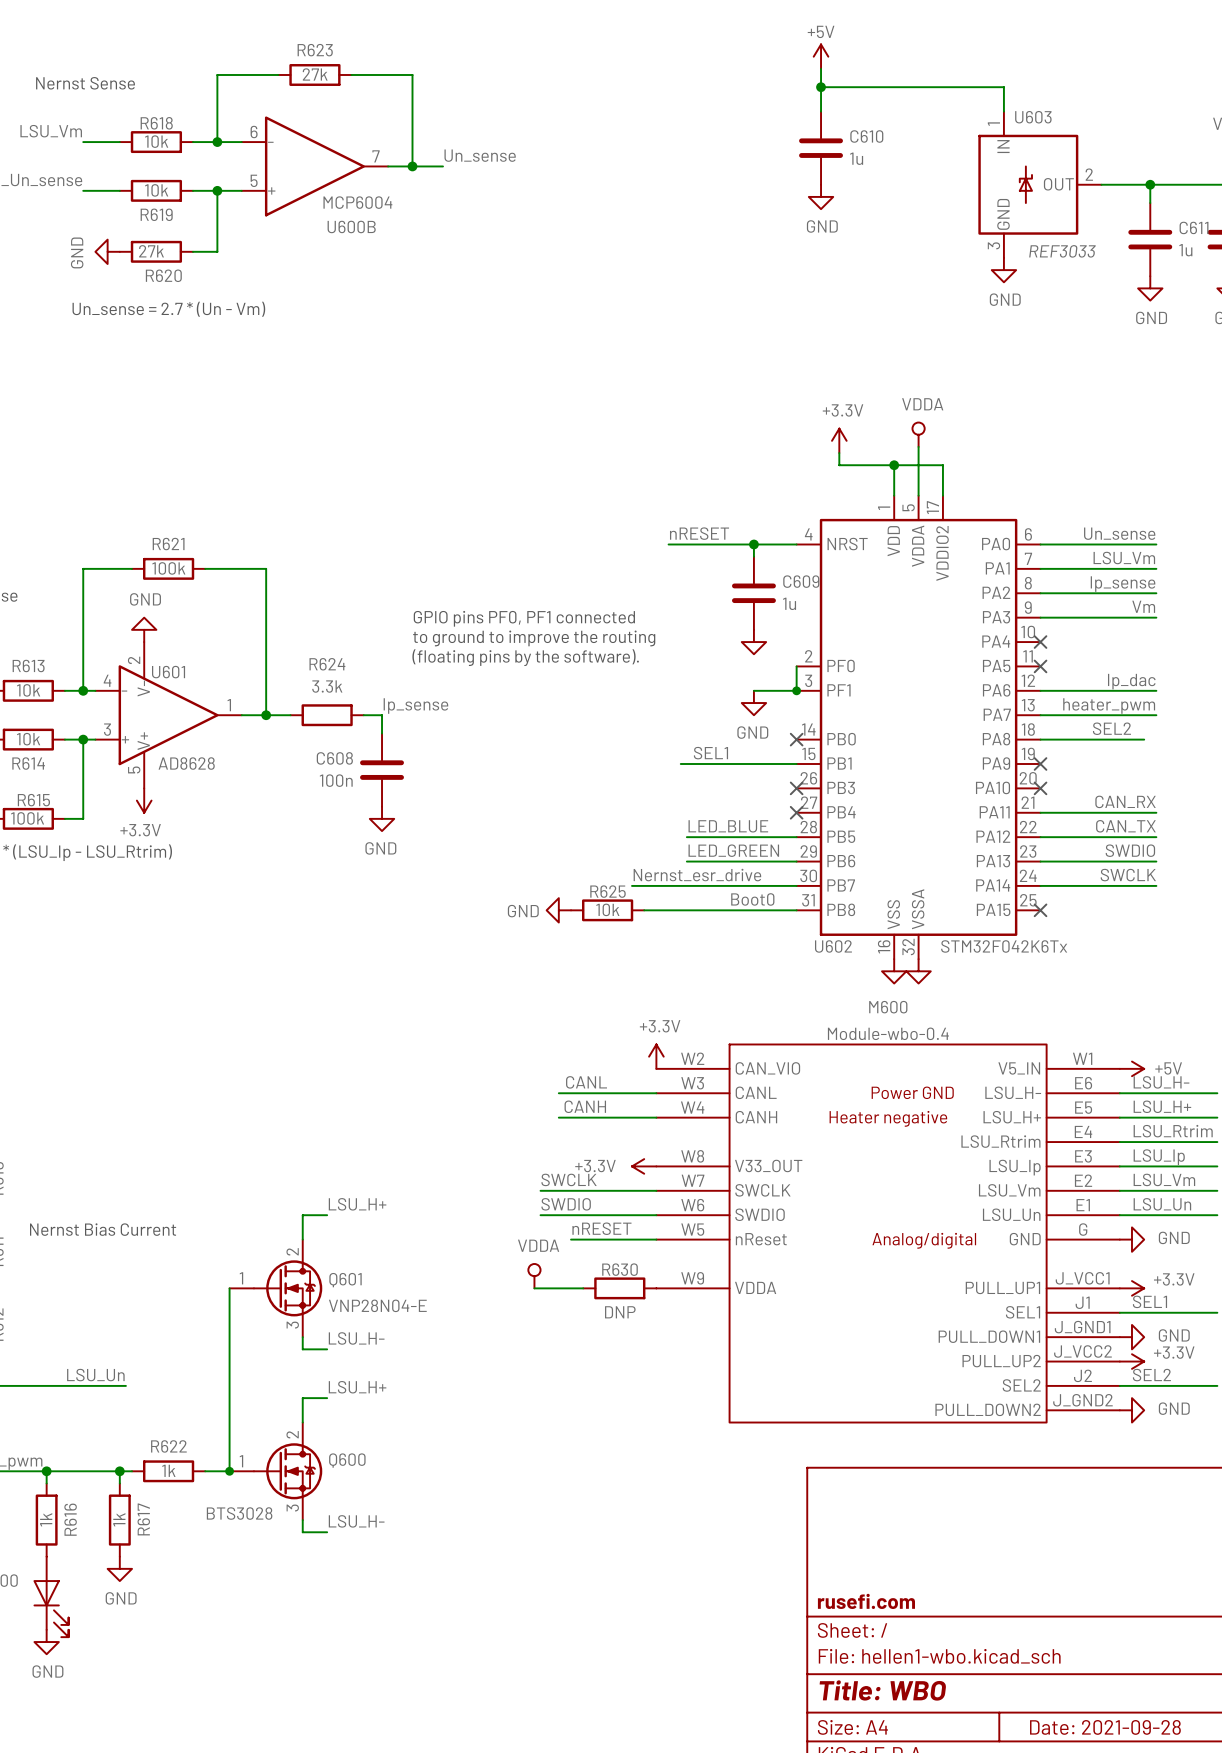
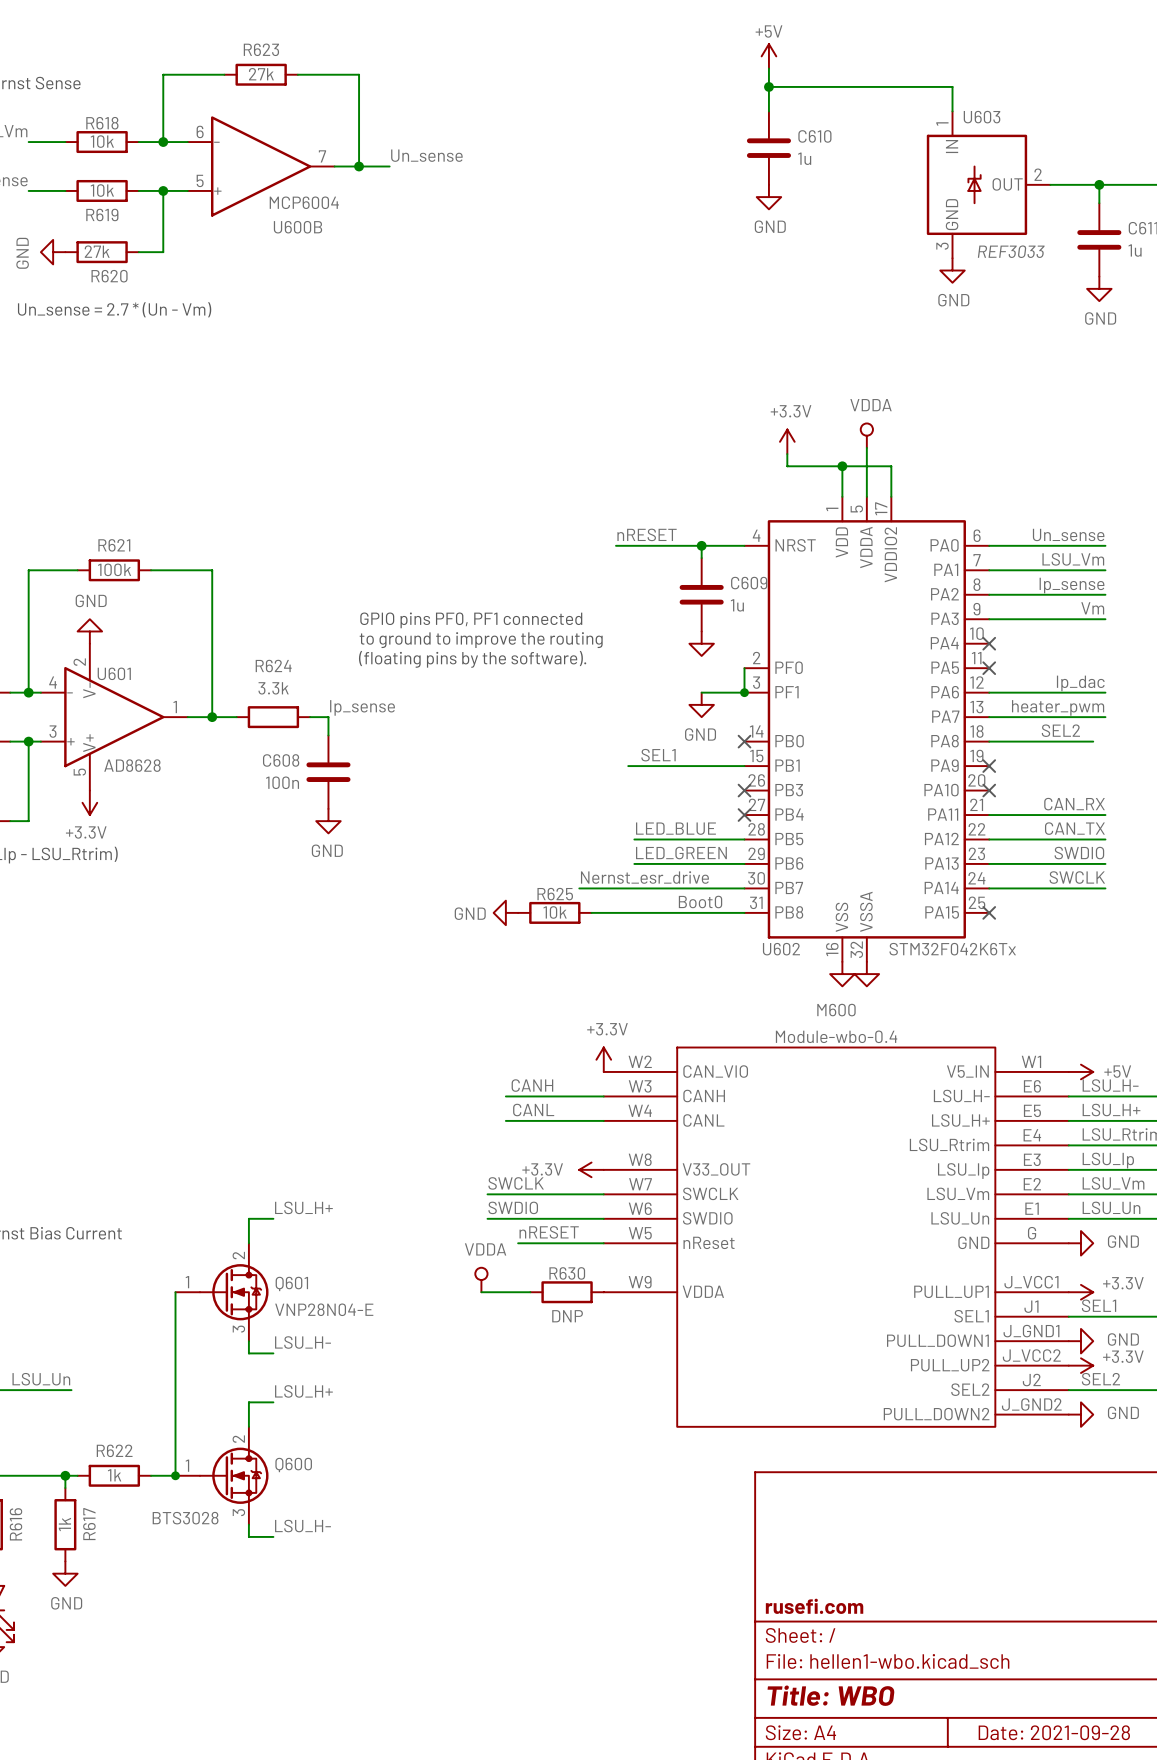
label: CANL (586, 1082) -> CANH (532, 1085)
M600 pin name: CANL (756, 1092) -> CANH (704, 1096)
M600 text: Power GND (912, 1092) -> none
label: CANH (585, 1106) -> CANL (533, 1110)
M600 pin name: CANH (756, 1117) -> CANL (703, 1120)
M600 text: Heater negative (888, 1118) -> none
M600 text: Analog/digital (924, 1240) -> none

